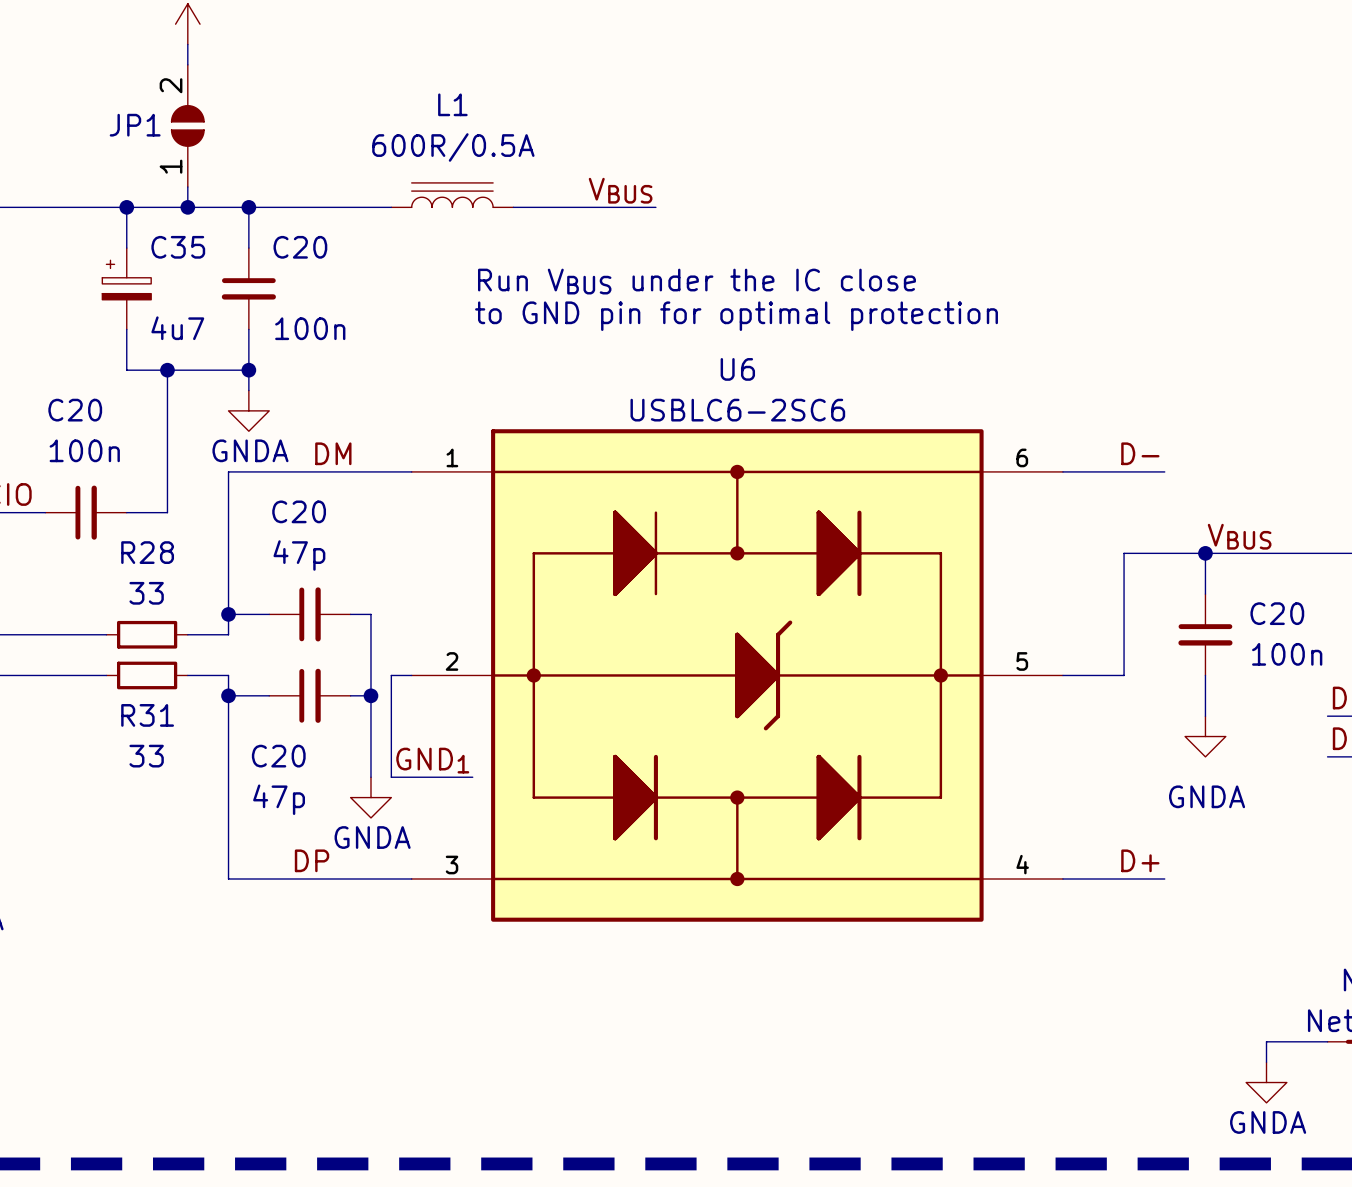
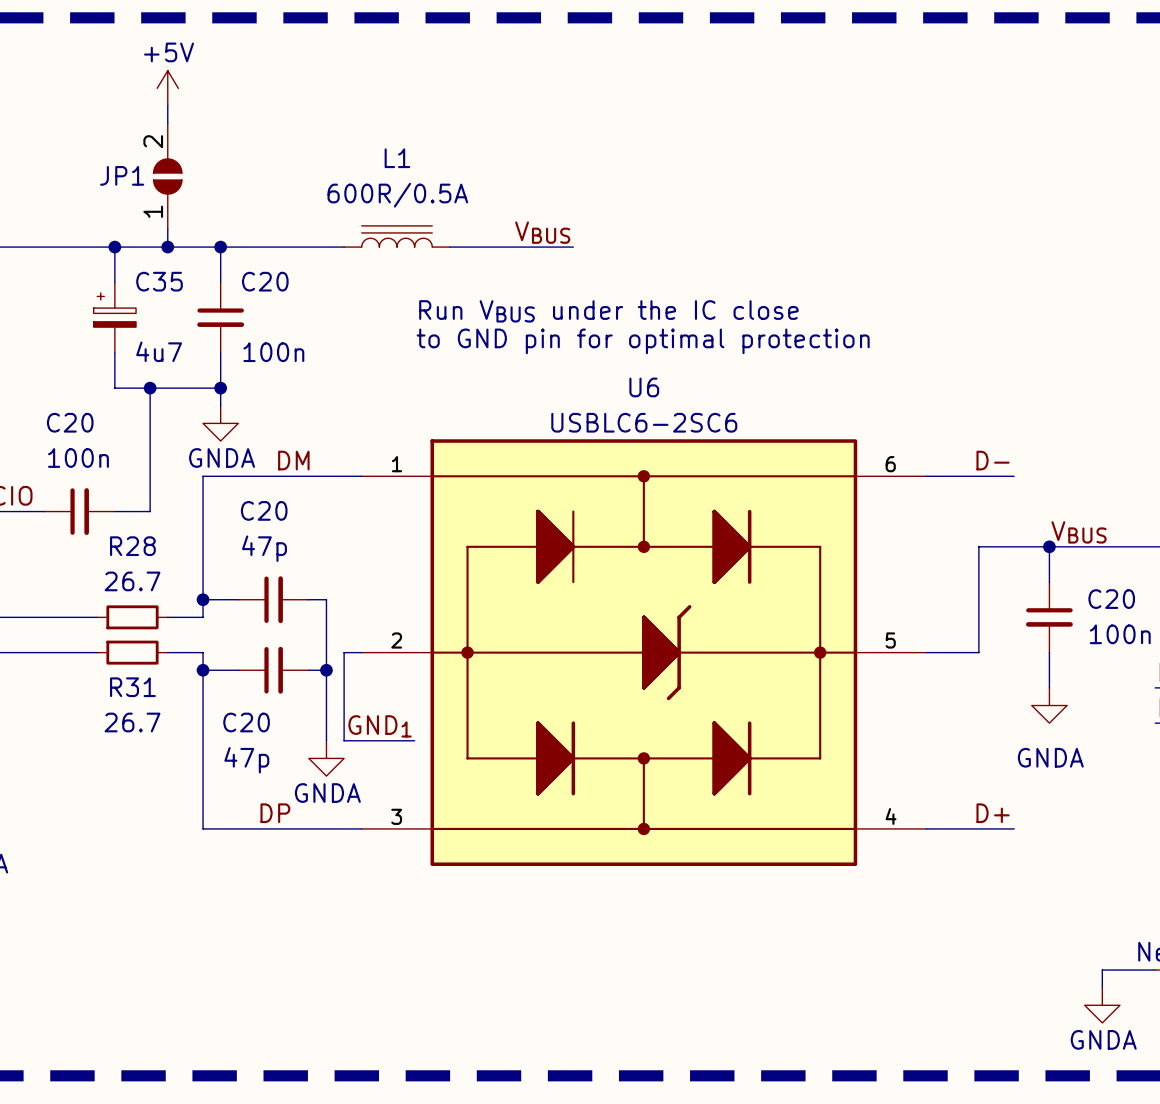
R28 value: 33 (146, 593) -> 26.7 (132, 581)
R31 value: 33 (146, 756) -> 26.7 (132, 722)

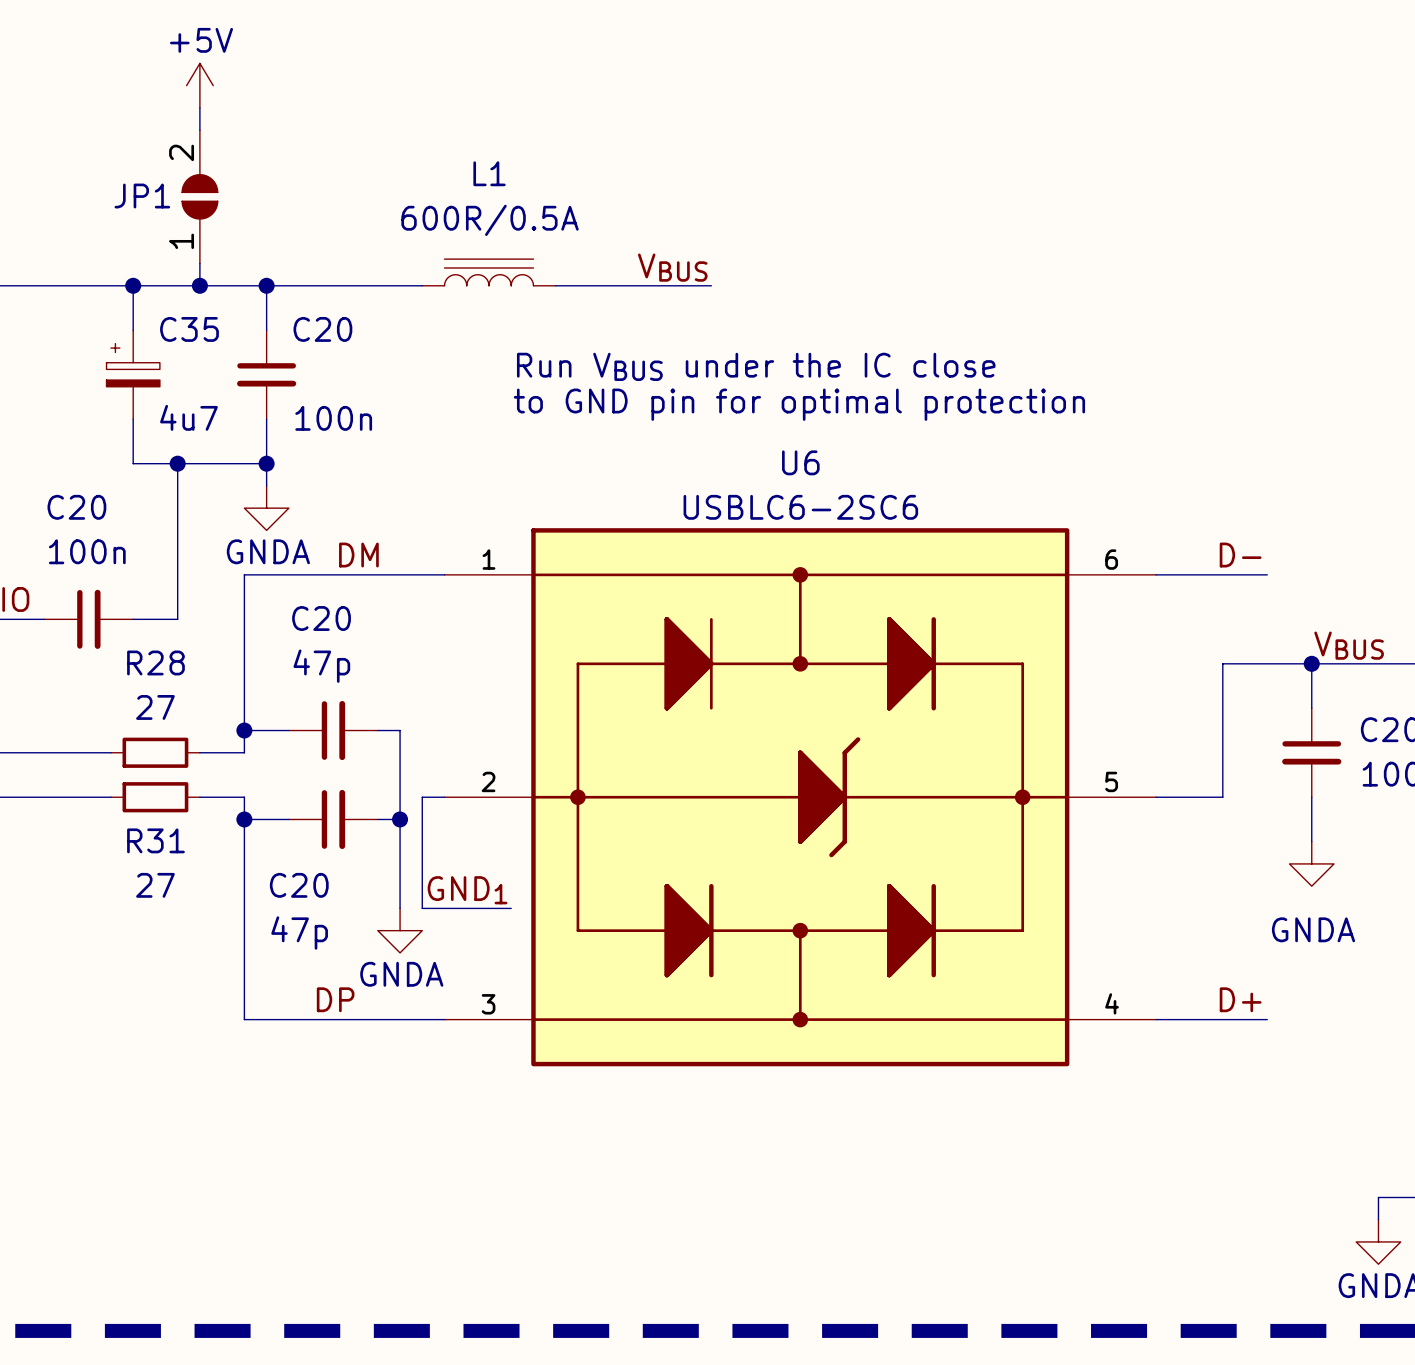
R28 value: 26.7 (132, 581) -> 27 (155, 707)
R31 value: 26.7 (132, 722) -> 27 (155, 885)

